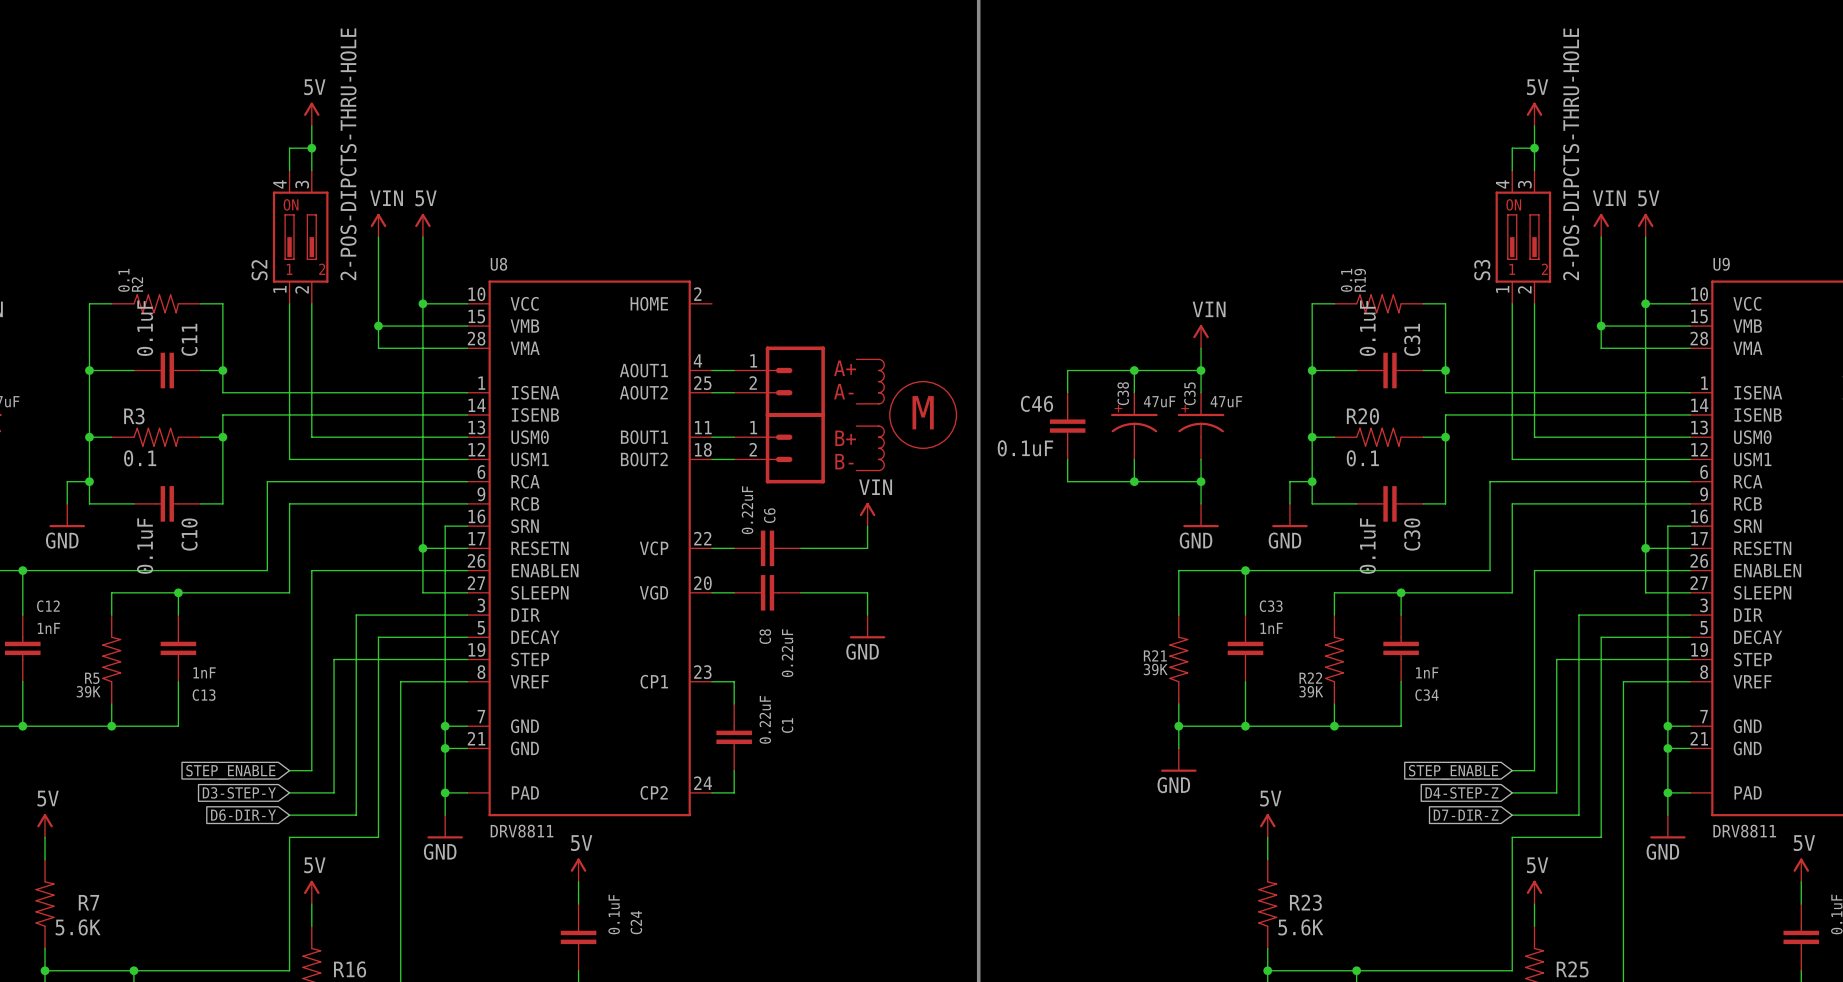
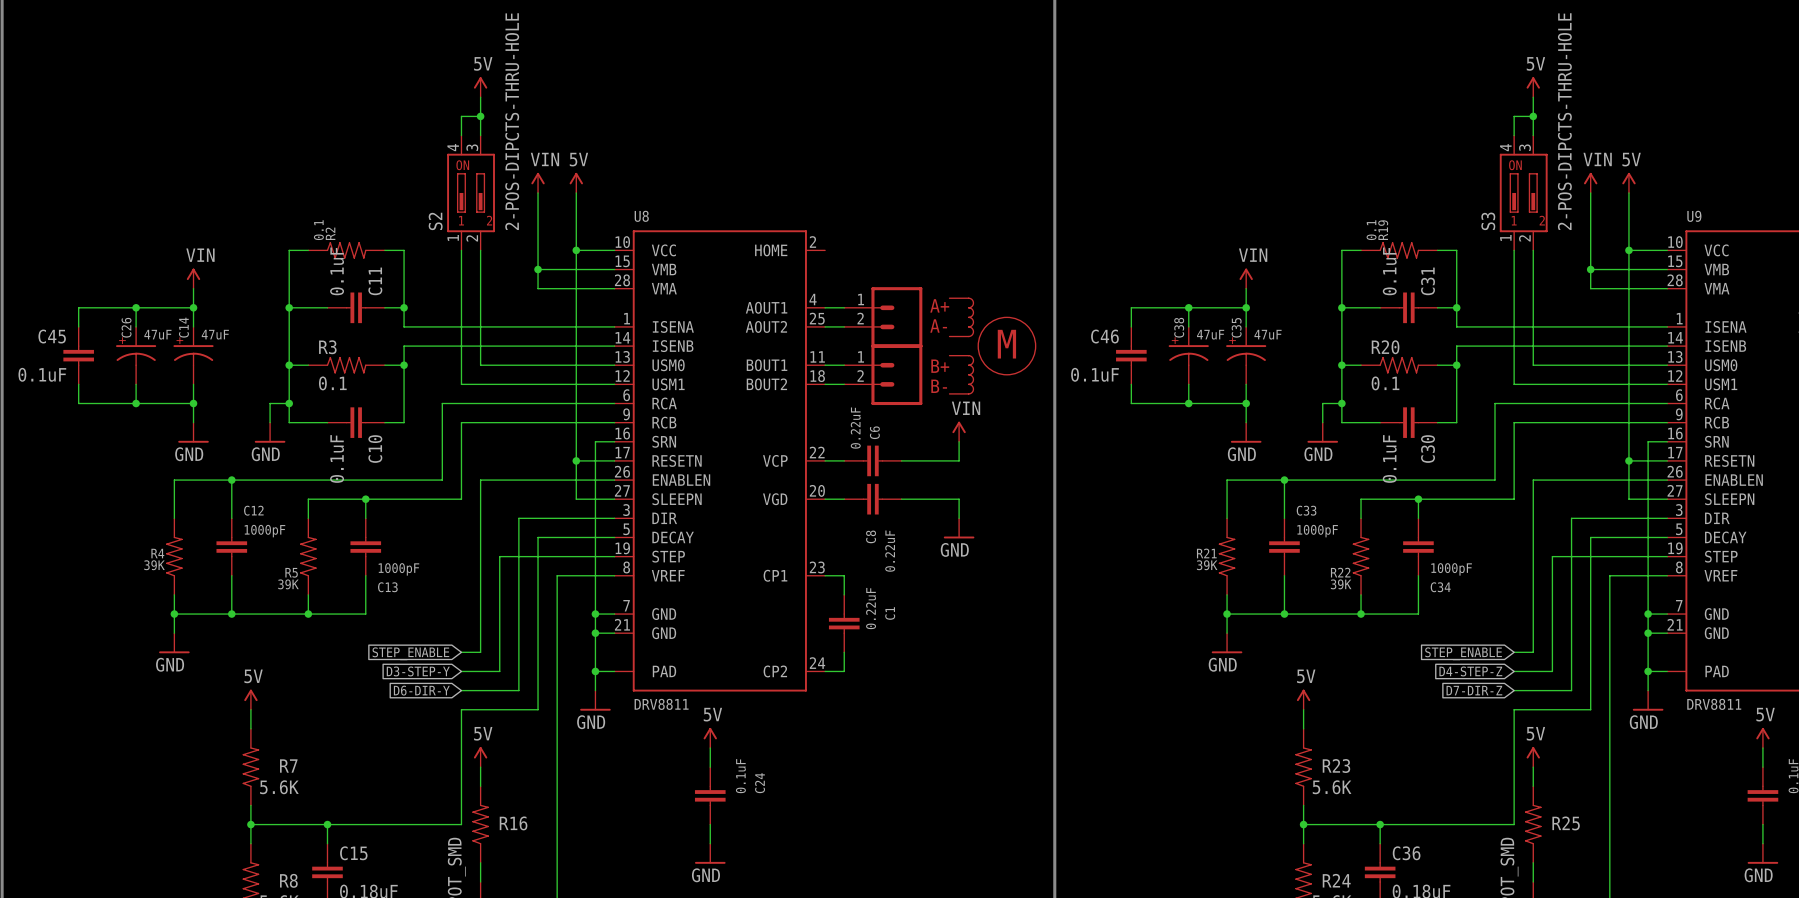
C12 value: 1nF (48, 628) -> 1000pF (264, 531)
C33 value: 1nF (1271, 628) -> 1000pF (1317, 531)
C13 value: 1nF (204, 672) -> 1000pF (398, 569)
C34 value: 1nF (1427, 672) -> 1000pF (1451, 569)

